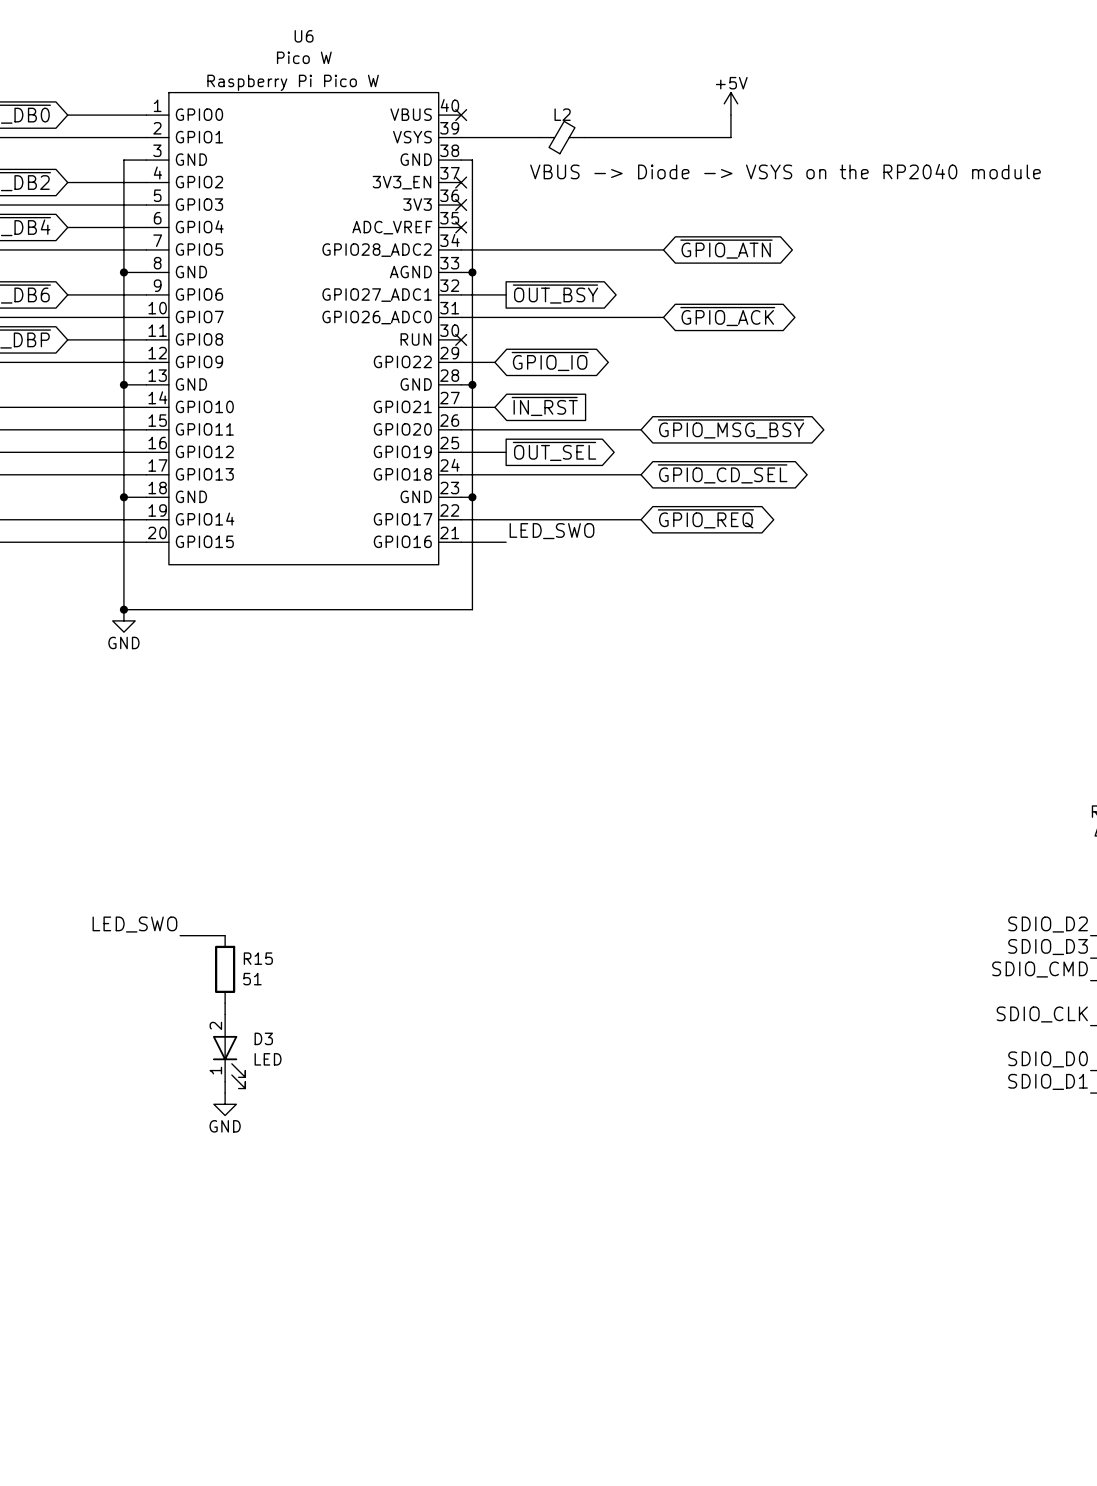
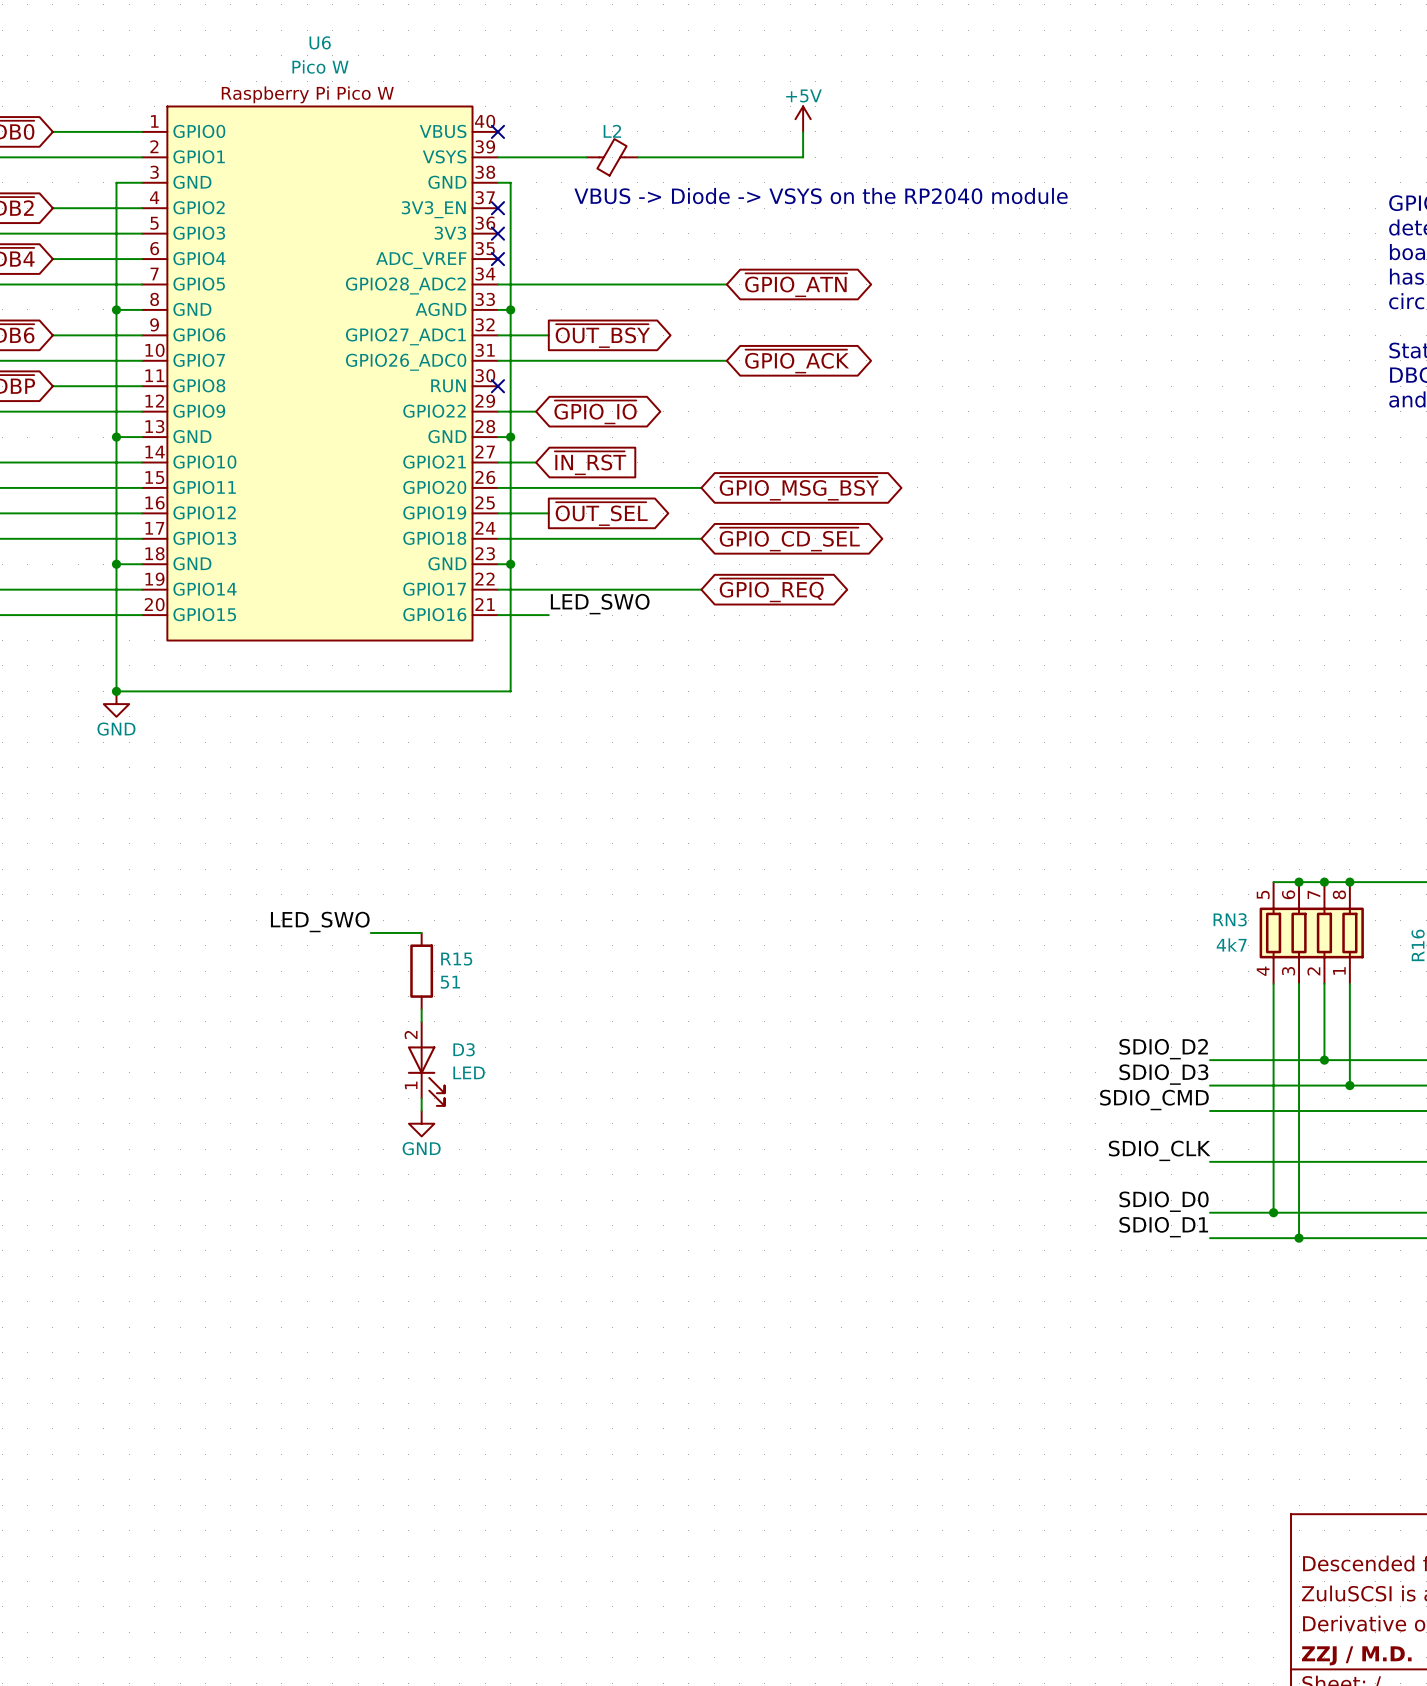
wire: none -> (421, 1009) (421, 1021)
label position: LED_SWO (134, 924) -> LED_SWO (320, 922)
wire: (180, 935) (225, 935) -> (370, 932) (421, 932)
R15 position: (225, 969) -> (421, 971)
wire: (225, 1003) (225, 1014) -> (421, 1098) (421, 1111)
D3 position: (229, 1051) -> (426, 1063)
wire: (225, 1081) (225, 1093) -> none
power symbol position: GND (225, 1104) -> GND (421, 1123)

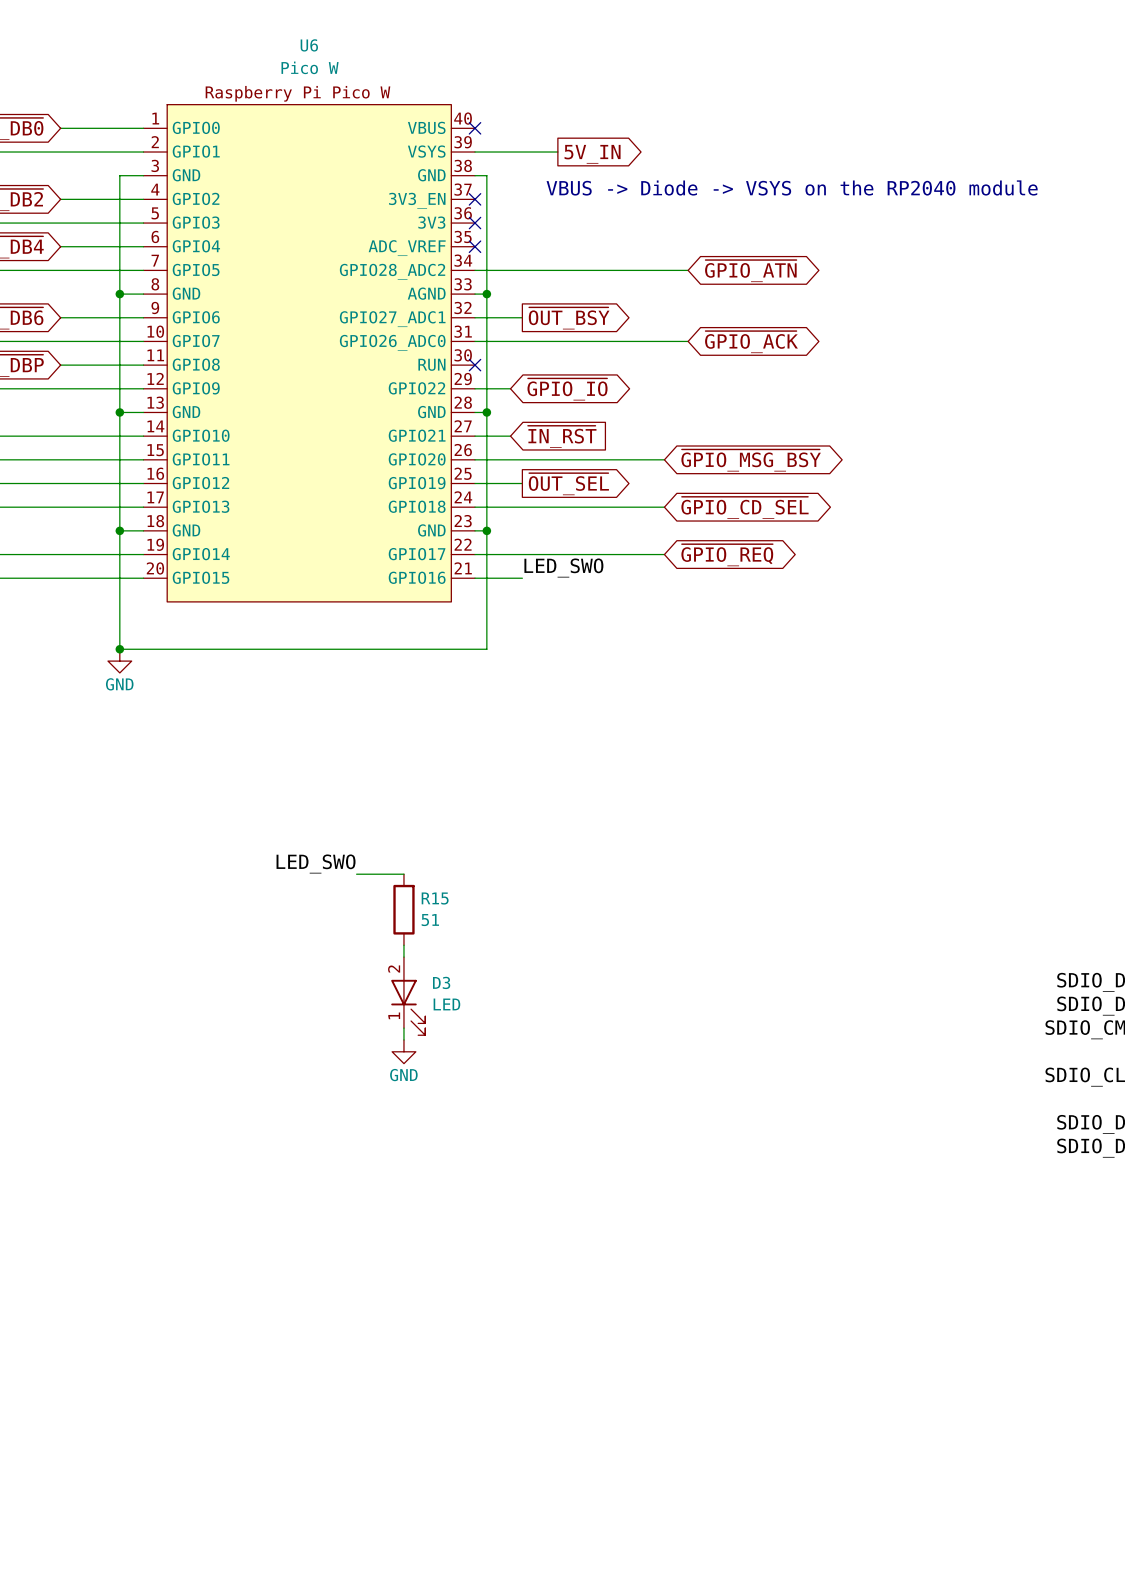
power symbol: +5V (803, 119) -> none
wire: (803, 131) (803, 157) (637, 157) -> none
L2: (612, 157) -> none
global label: none -> 5V_IN (592, 154)

